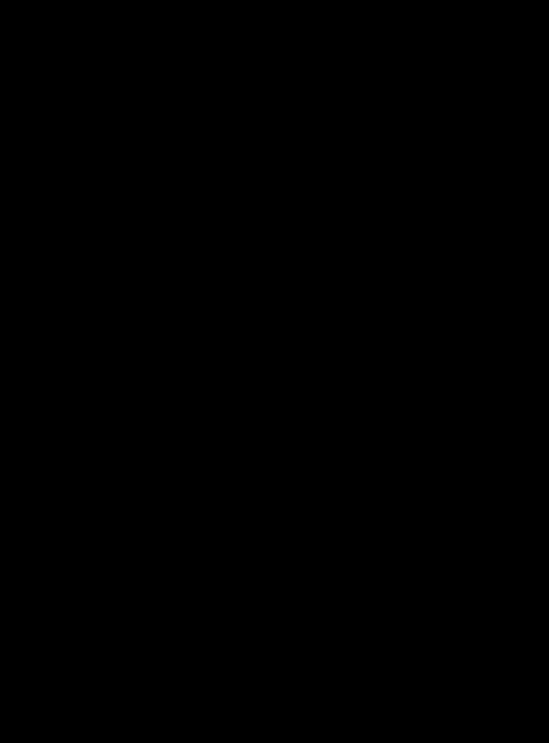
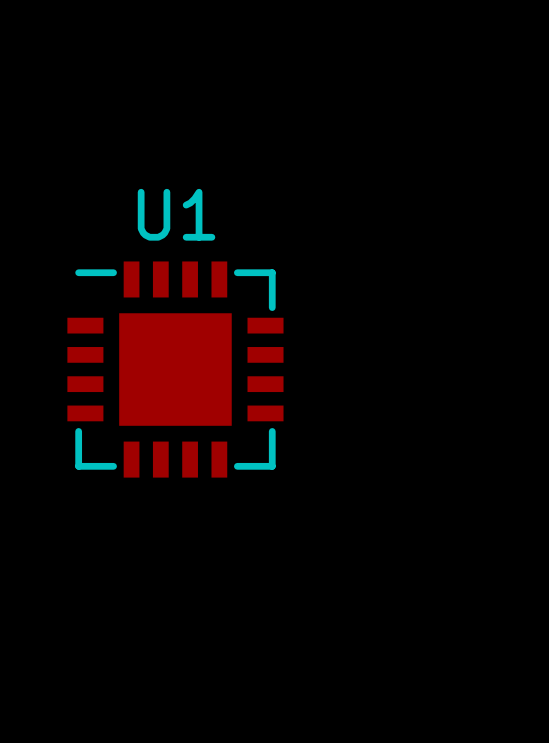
U1: none -> (175, 369)

